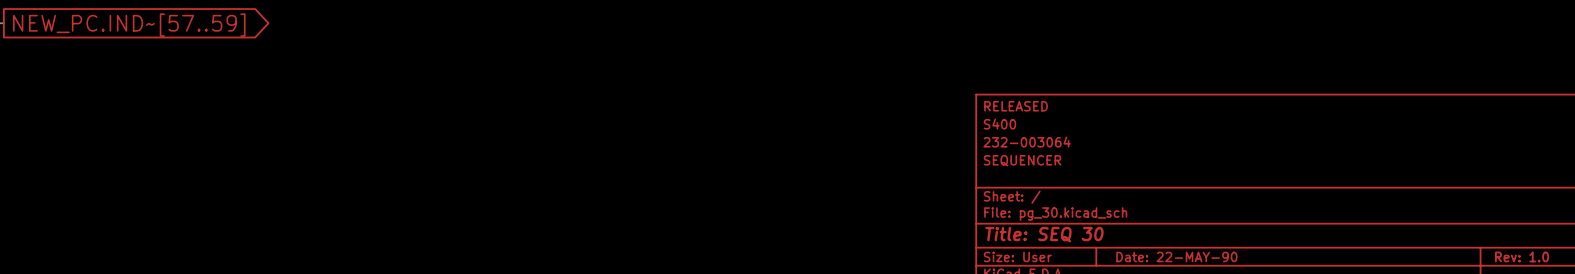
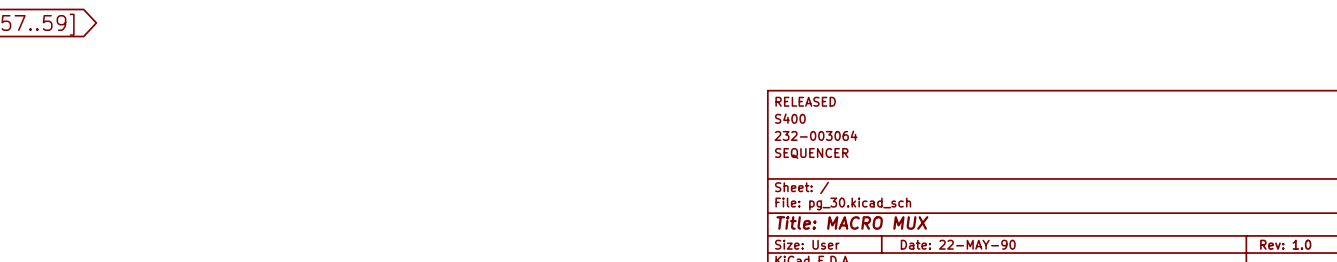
title block: Title: SEQ 30 (1044, 234) -> Title: MACRO MUX (852, 222)

